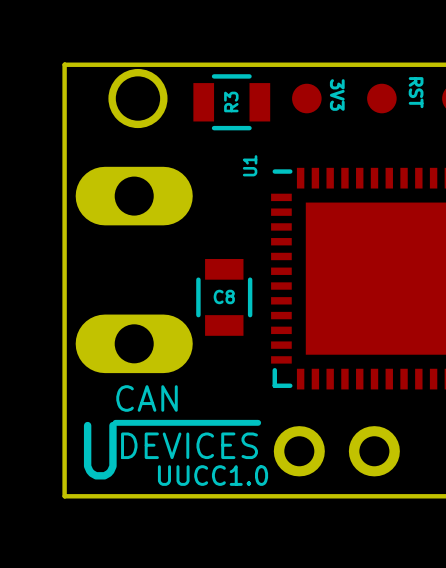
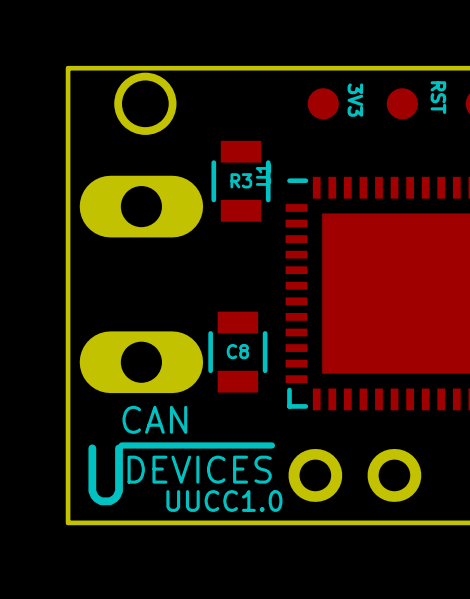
R3 rotation: 0° (231, 102) -> 90° clockwise (241, 181)
R3 position: (231, 102) -> (241, 181)
C8 position: (224, 297) -> (237, 352)

